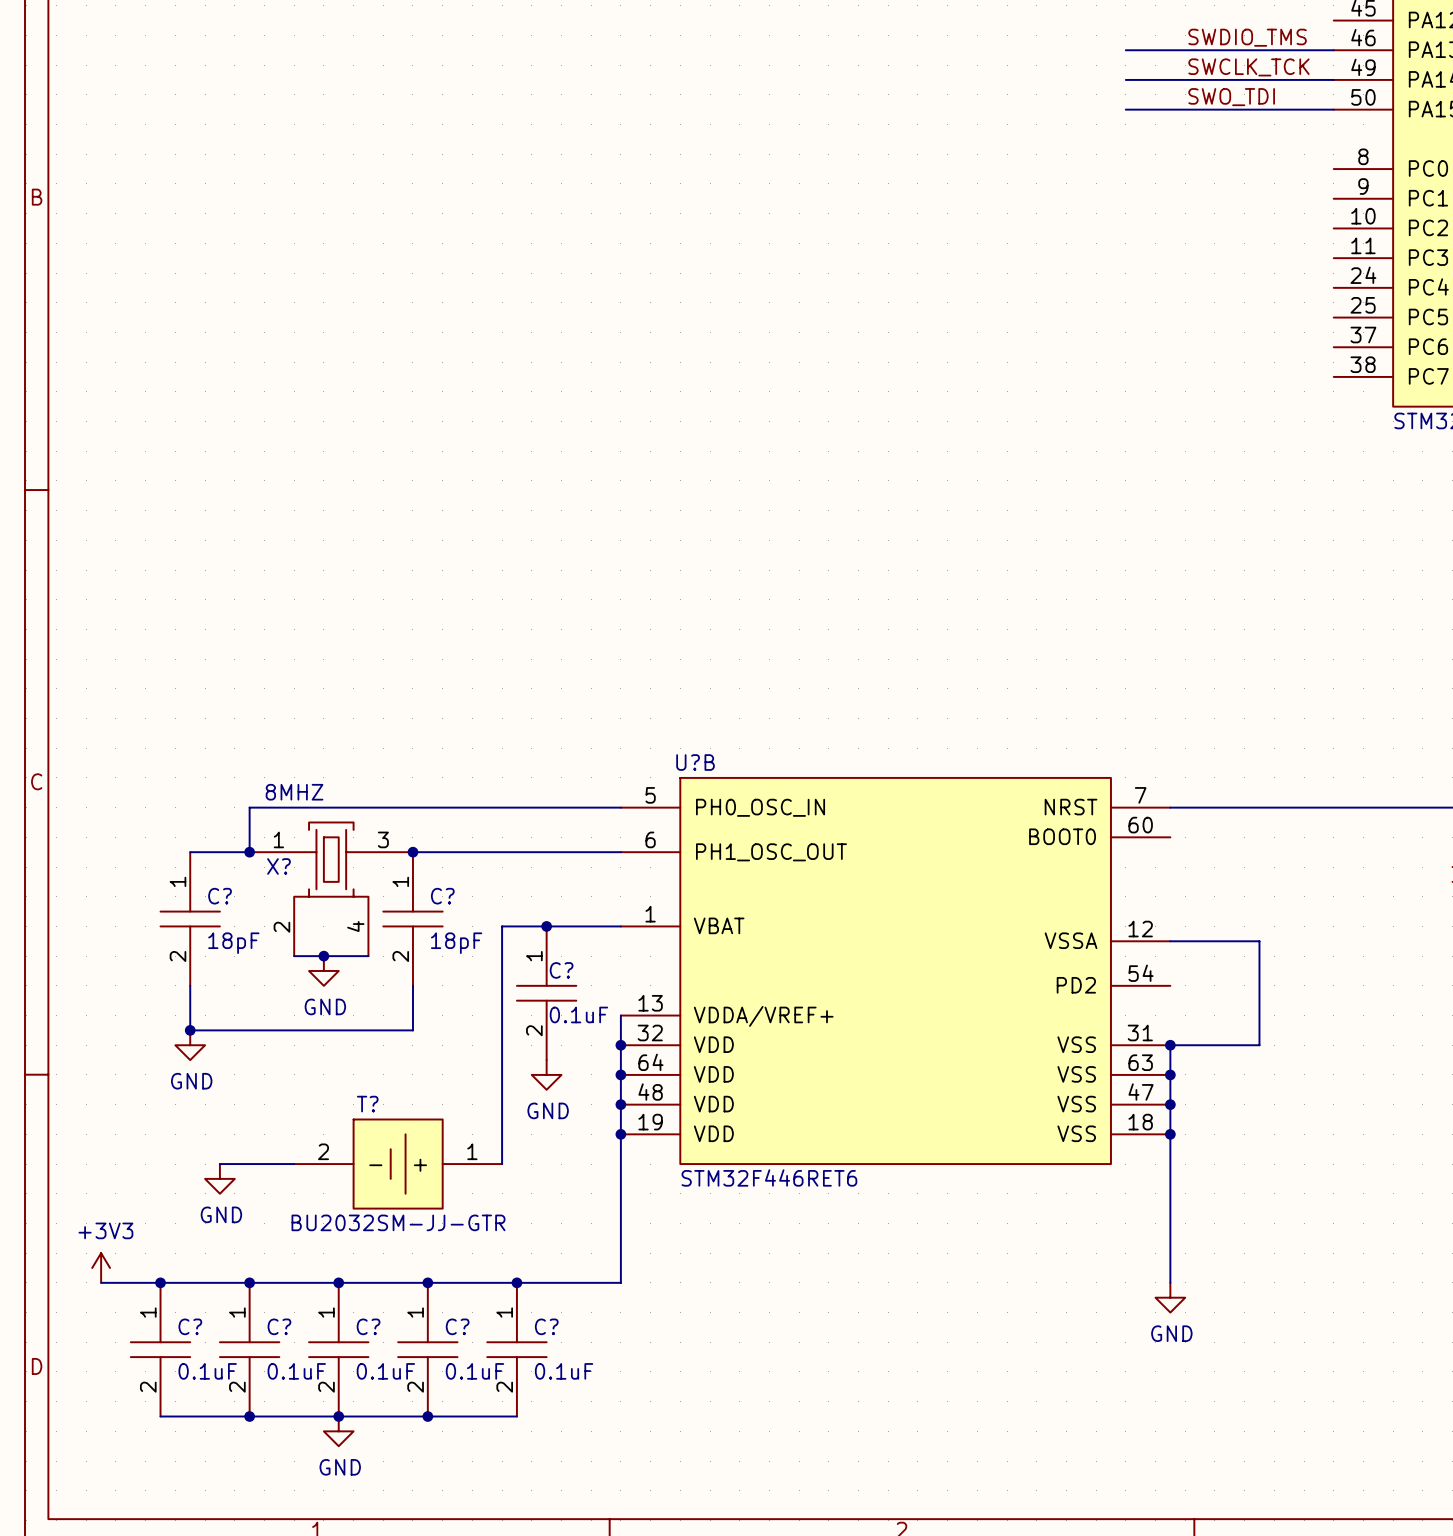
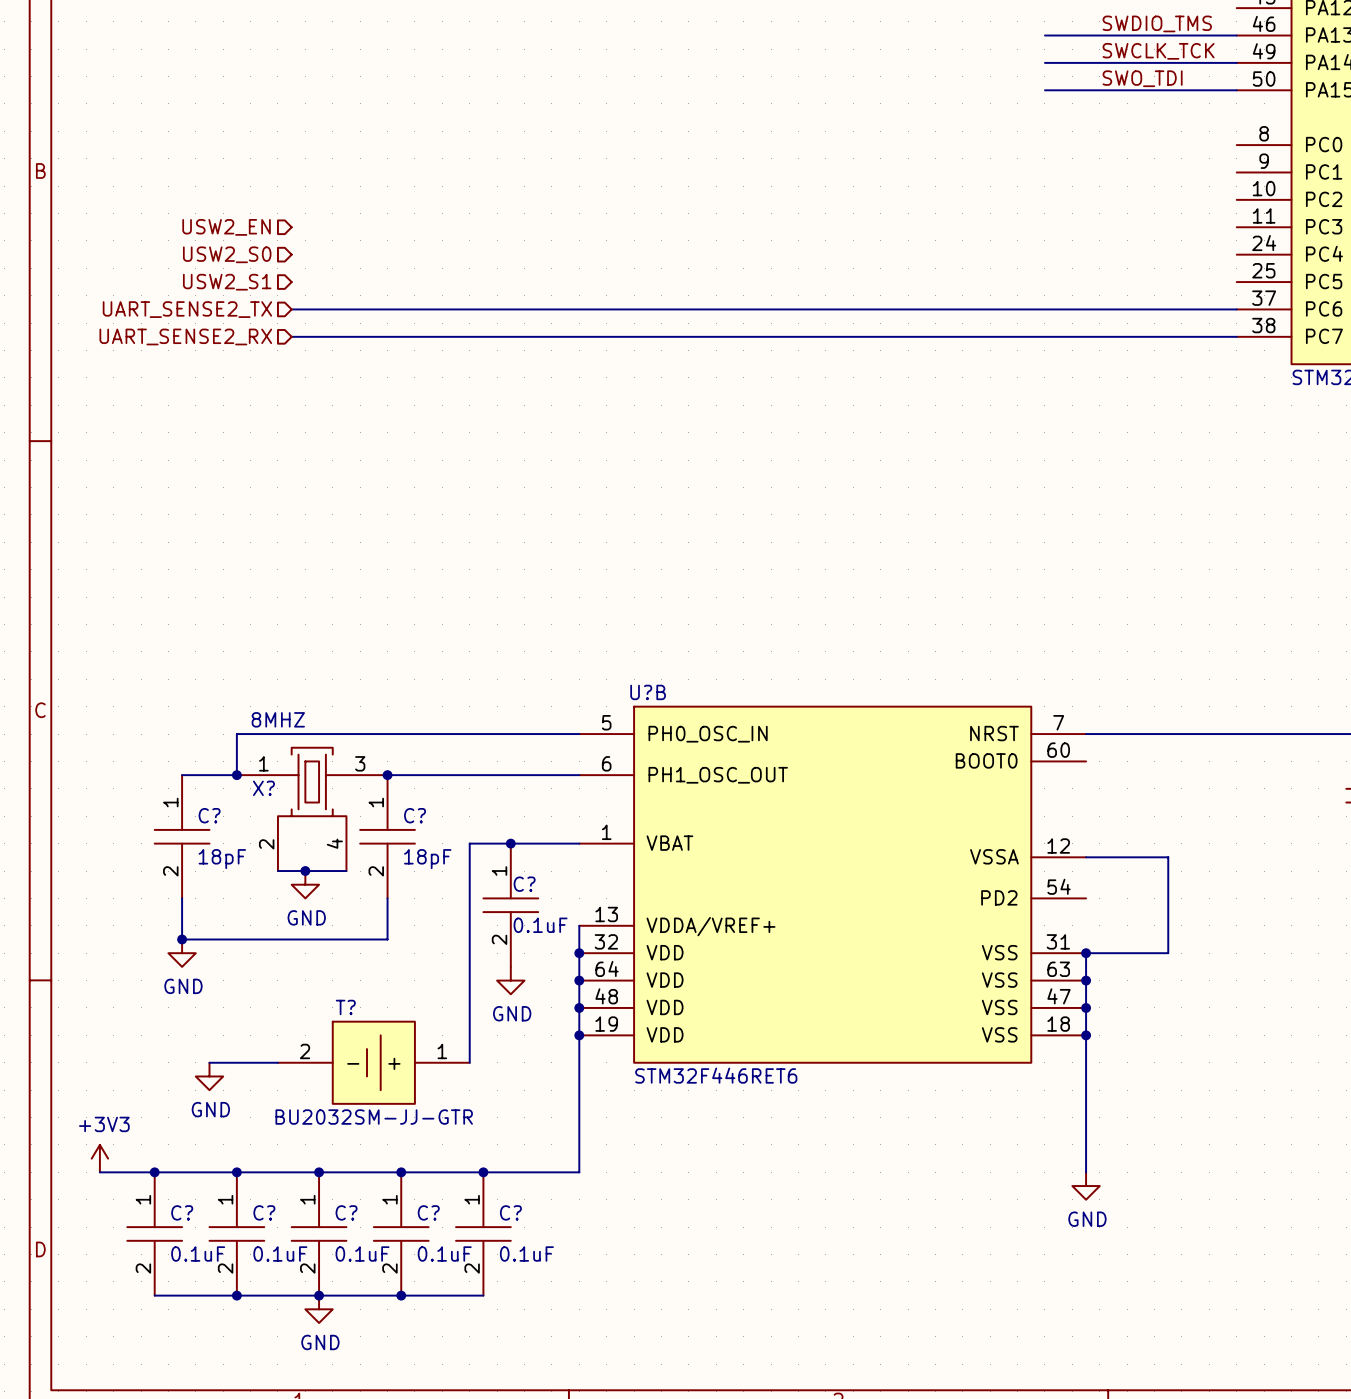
hierarchical label: none -> USW2_EN (226, 227)
hierarchical label: none -> USW2_S0 (227, 254)
hierarchical label: none -> USW2_S1 (227, 282)
hierarchical label: none -> UART_SENSE2_TX (187, 309)
wire: none -> (291, 309) (1236, 309)
wire: none -> (291, 336) (1236, 336)
hierarchical label: none -> UART_SENSE2_RX (185, 336)

